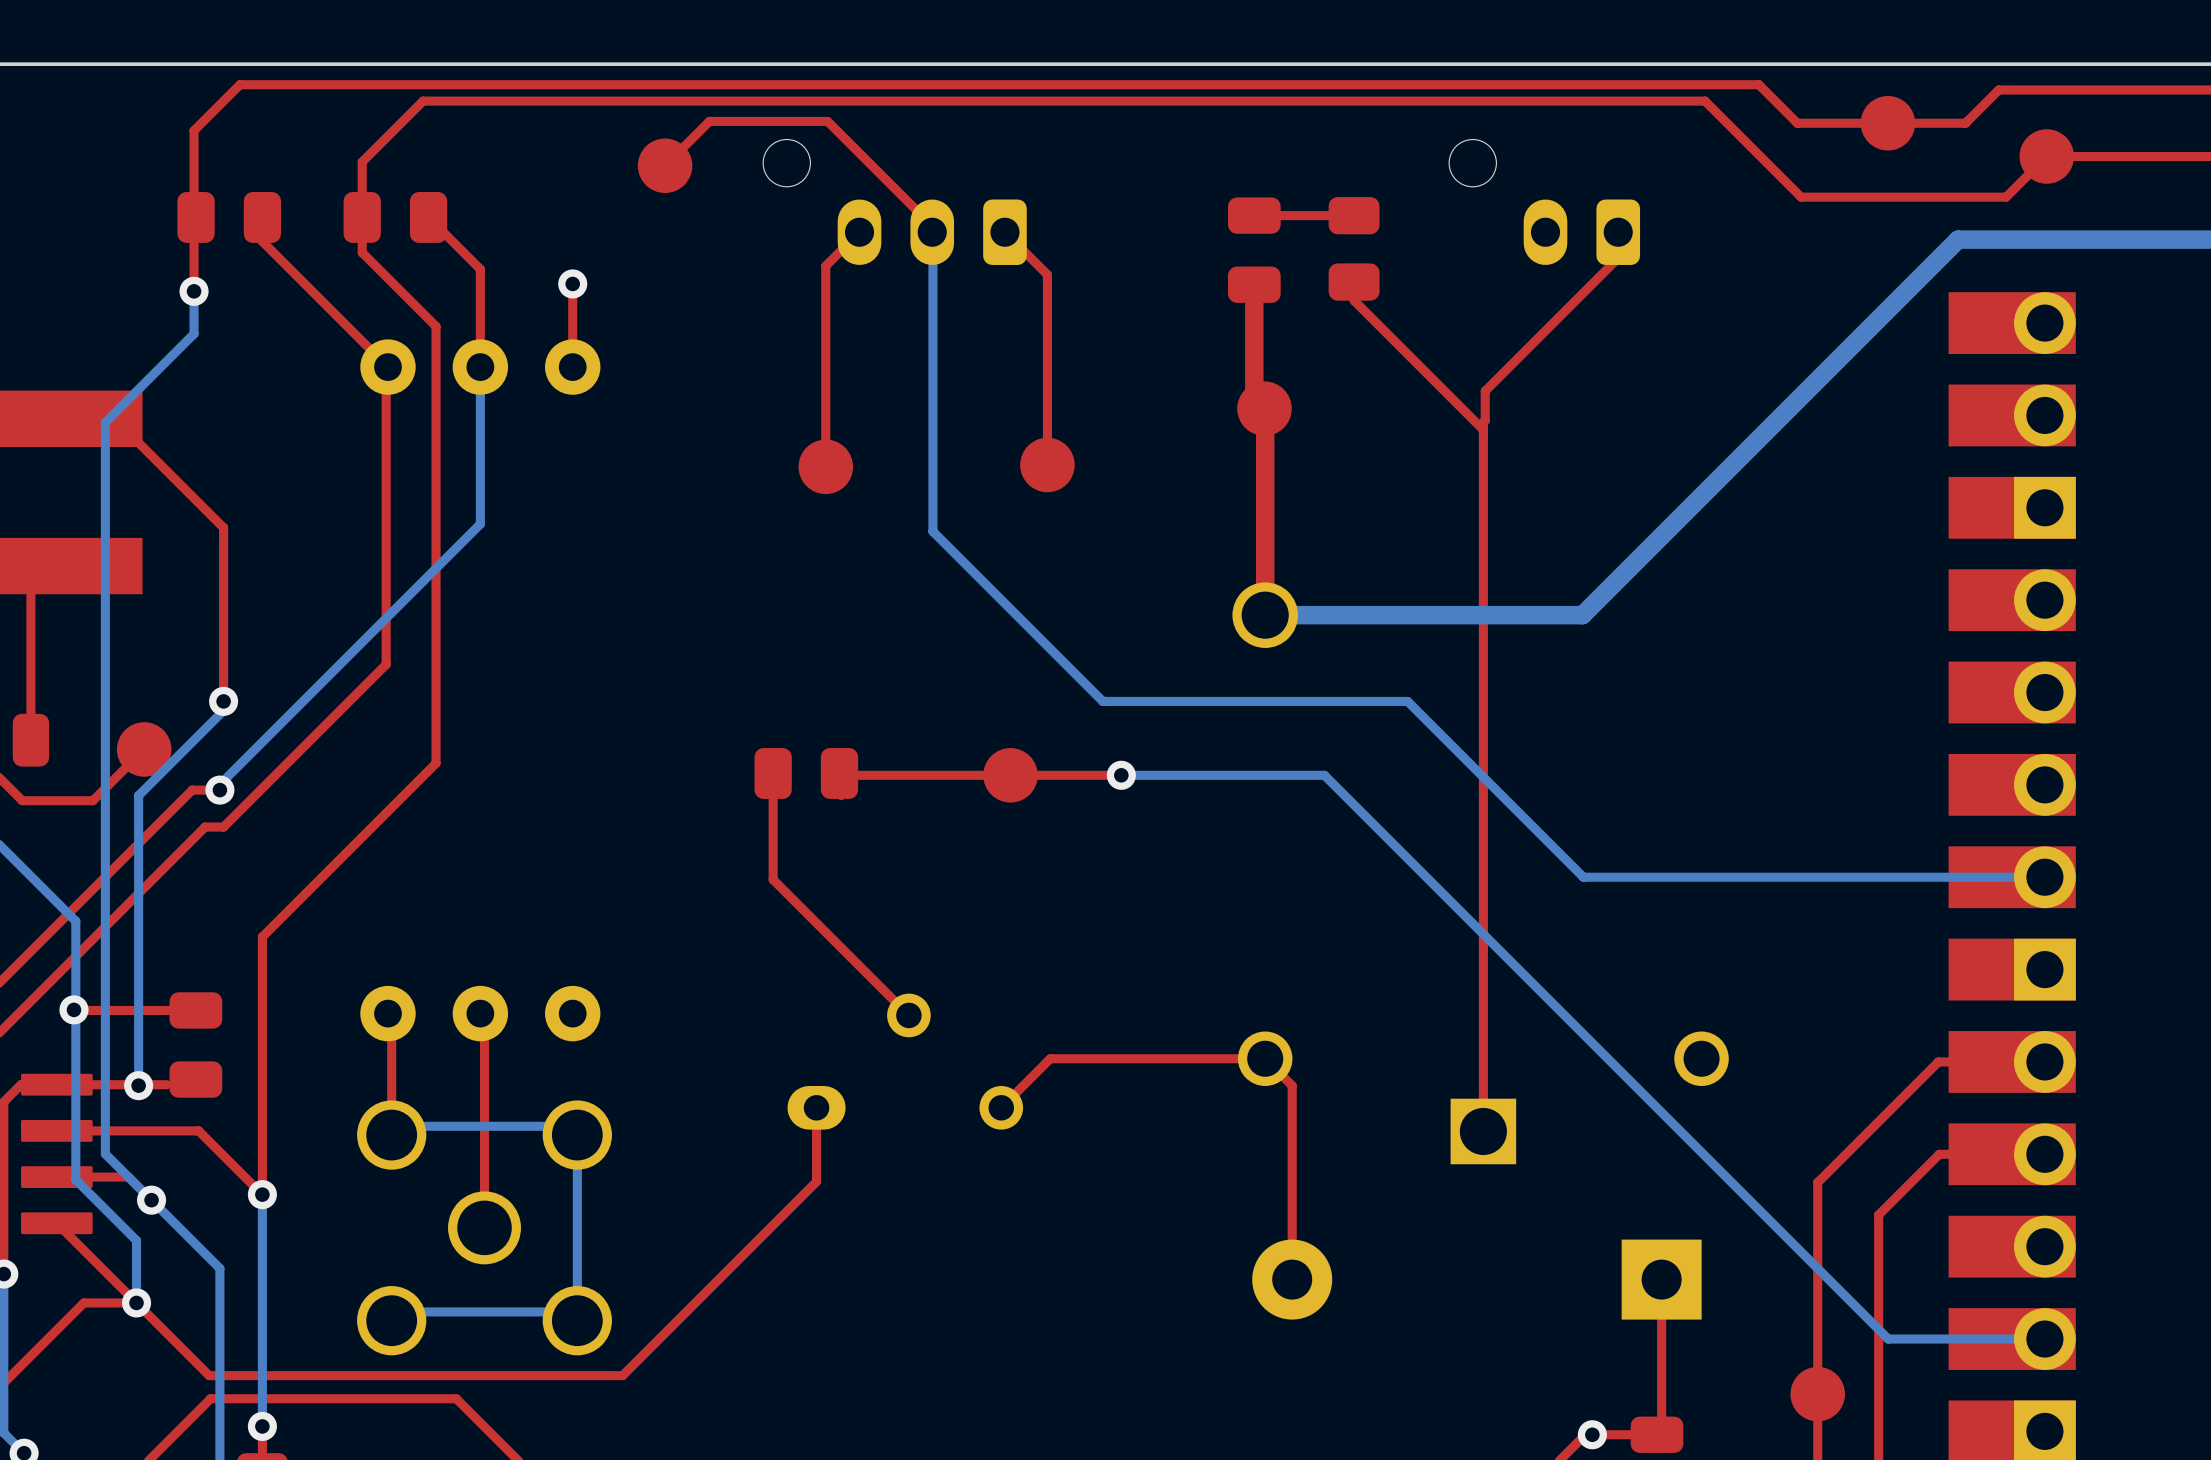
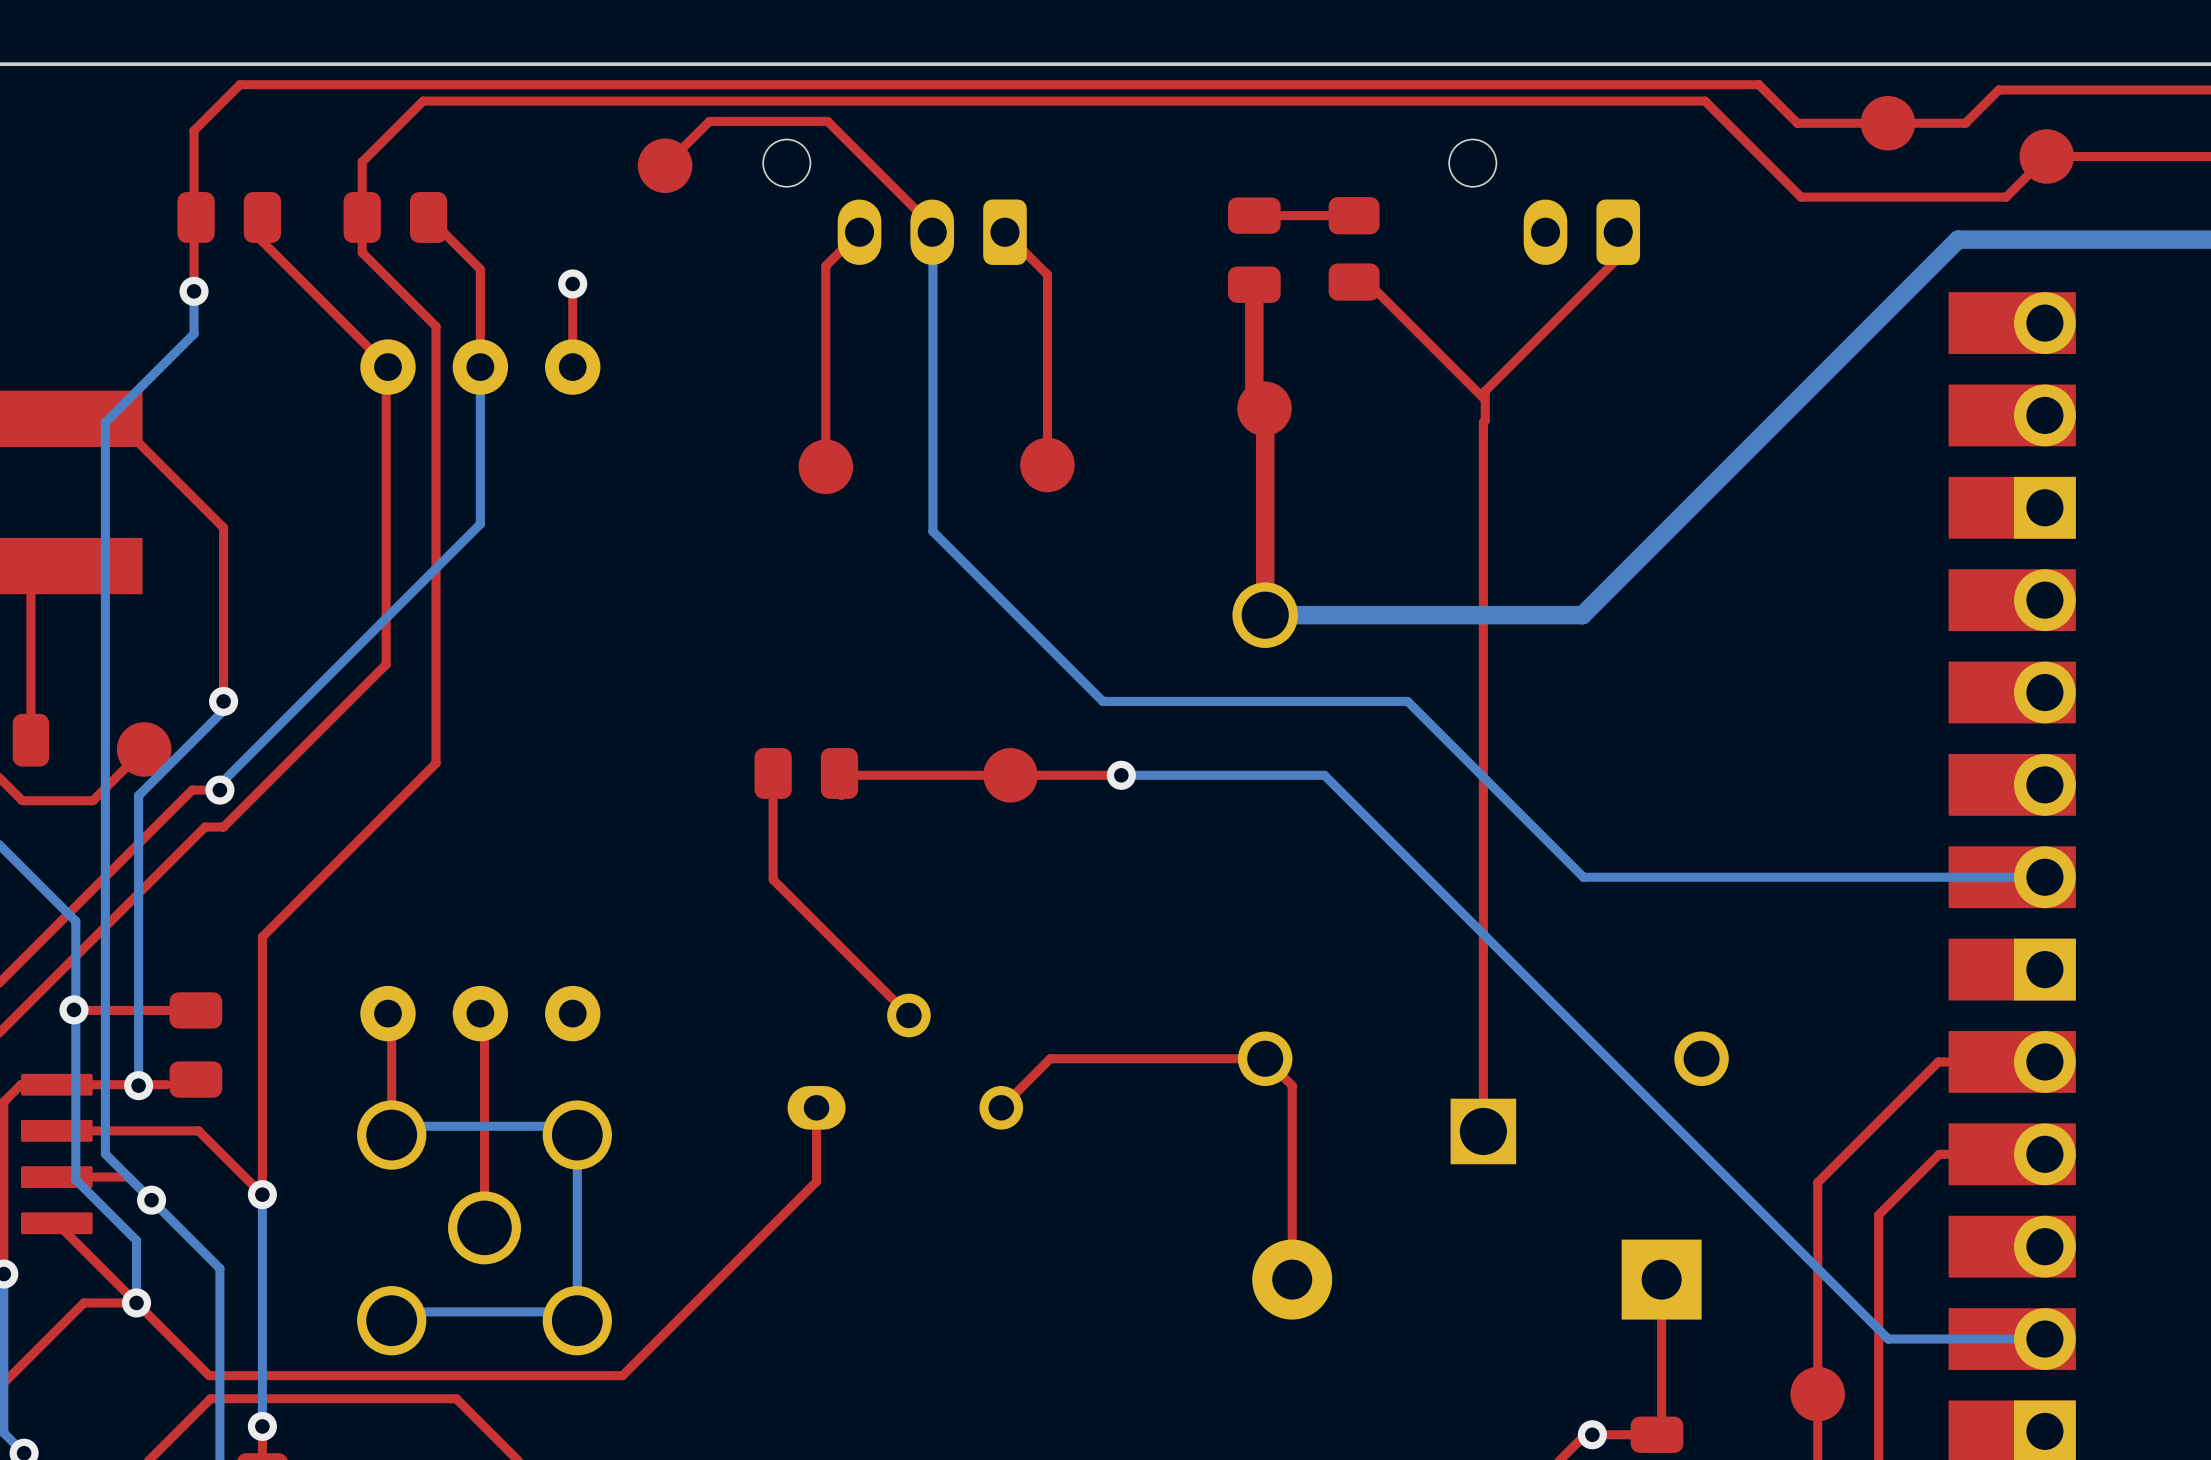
top track: (1354, 282) (1354, 300) (1483, 429) -> (1354, 282) (1367, 282) (1483, 398)

